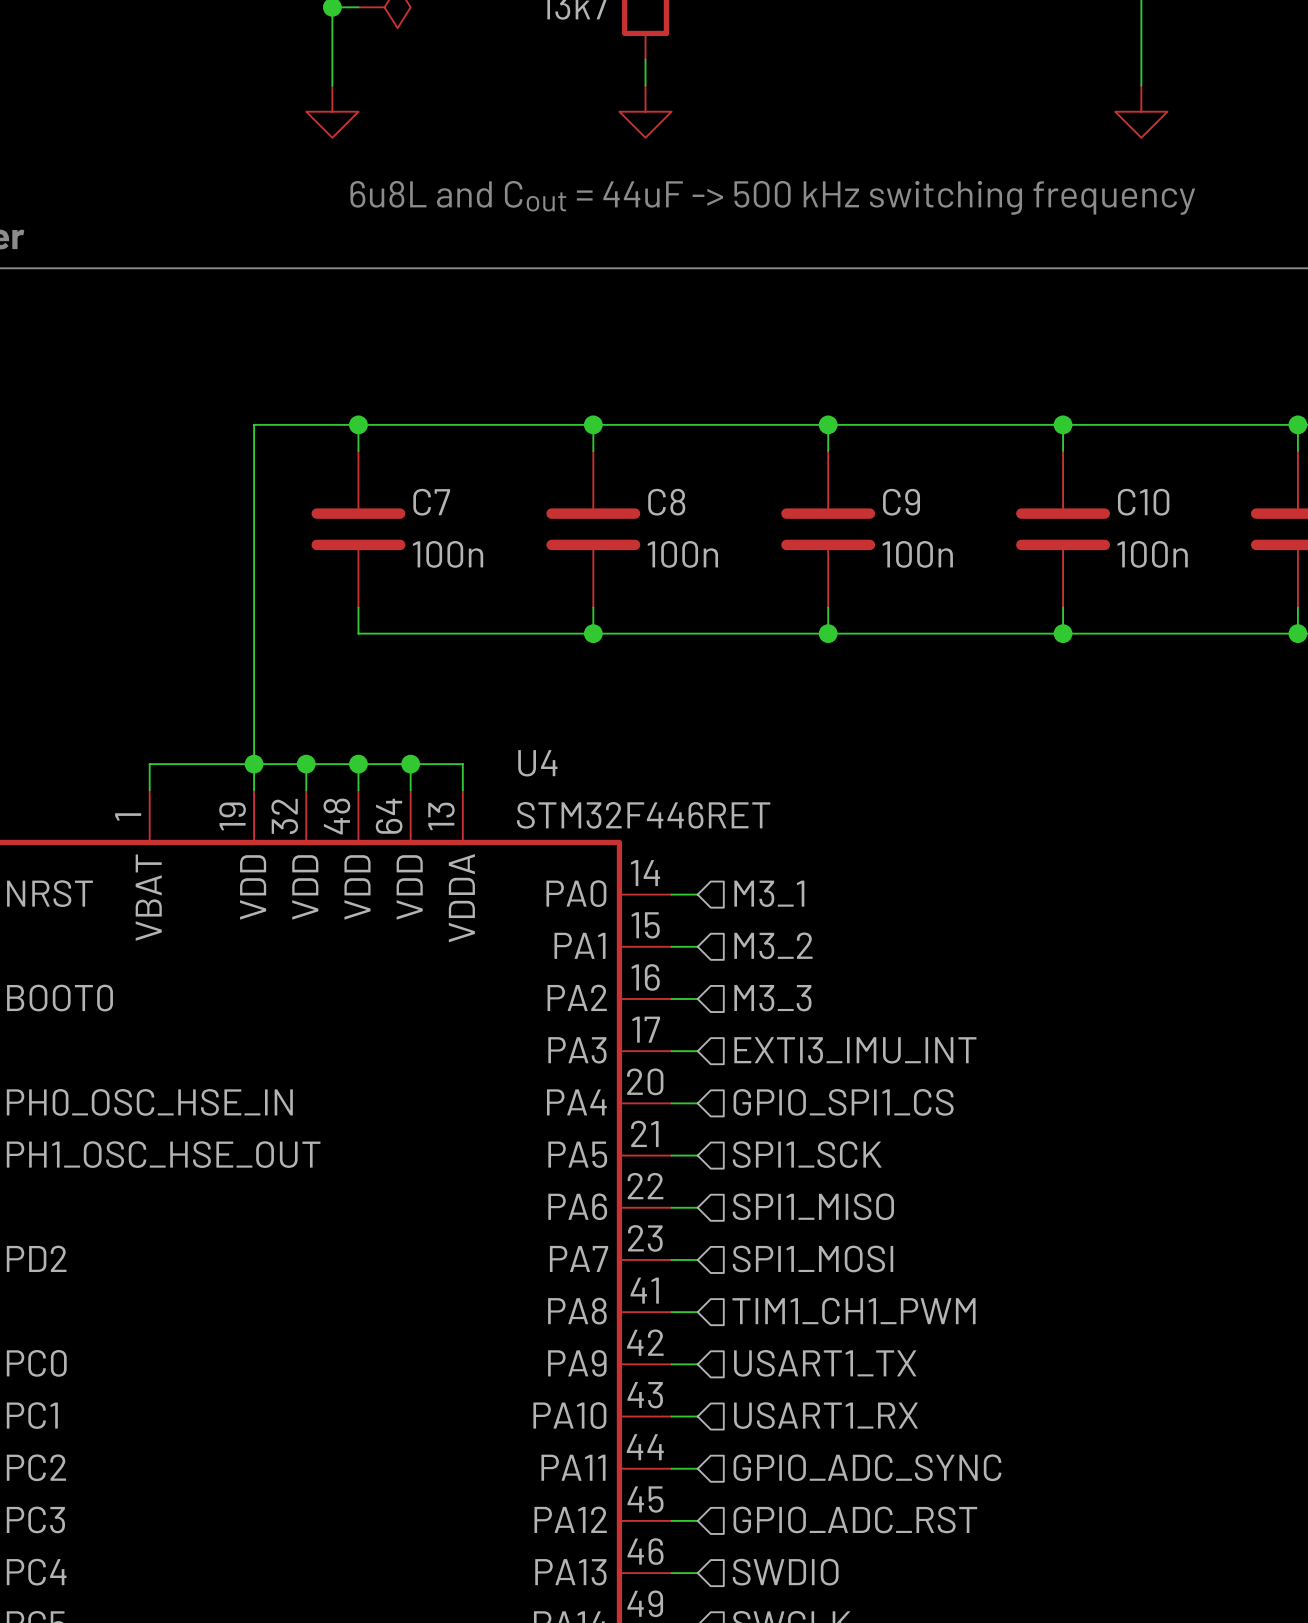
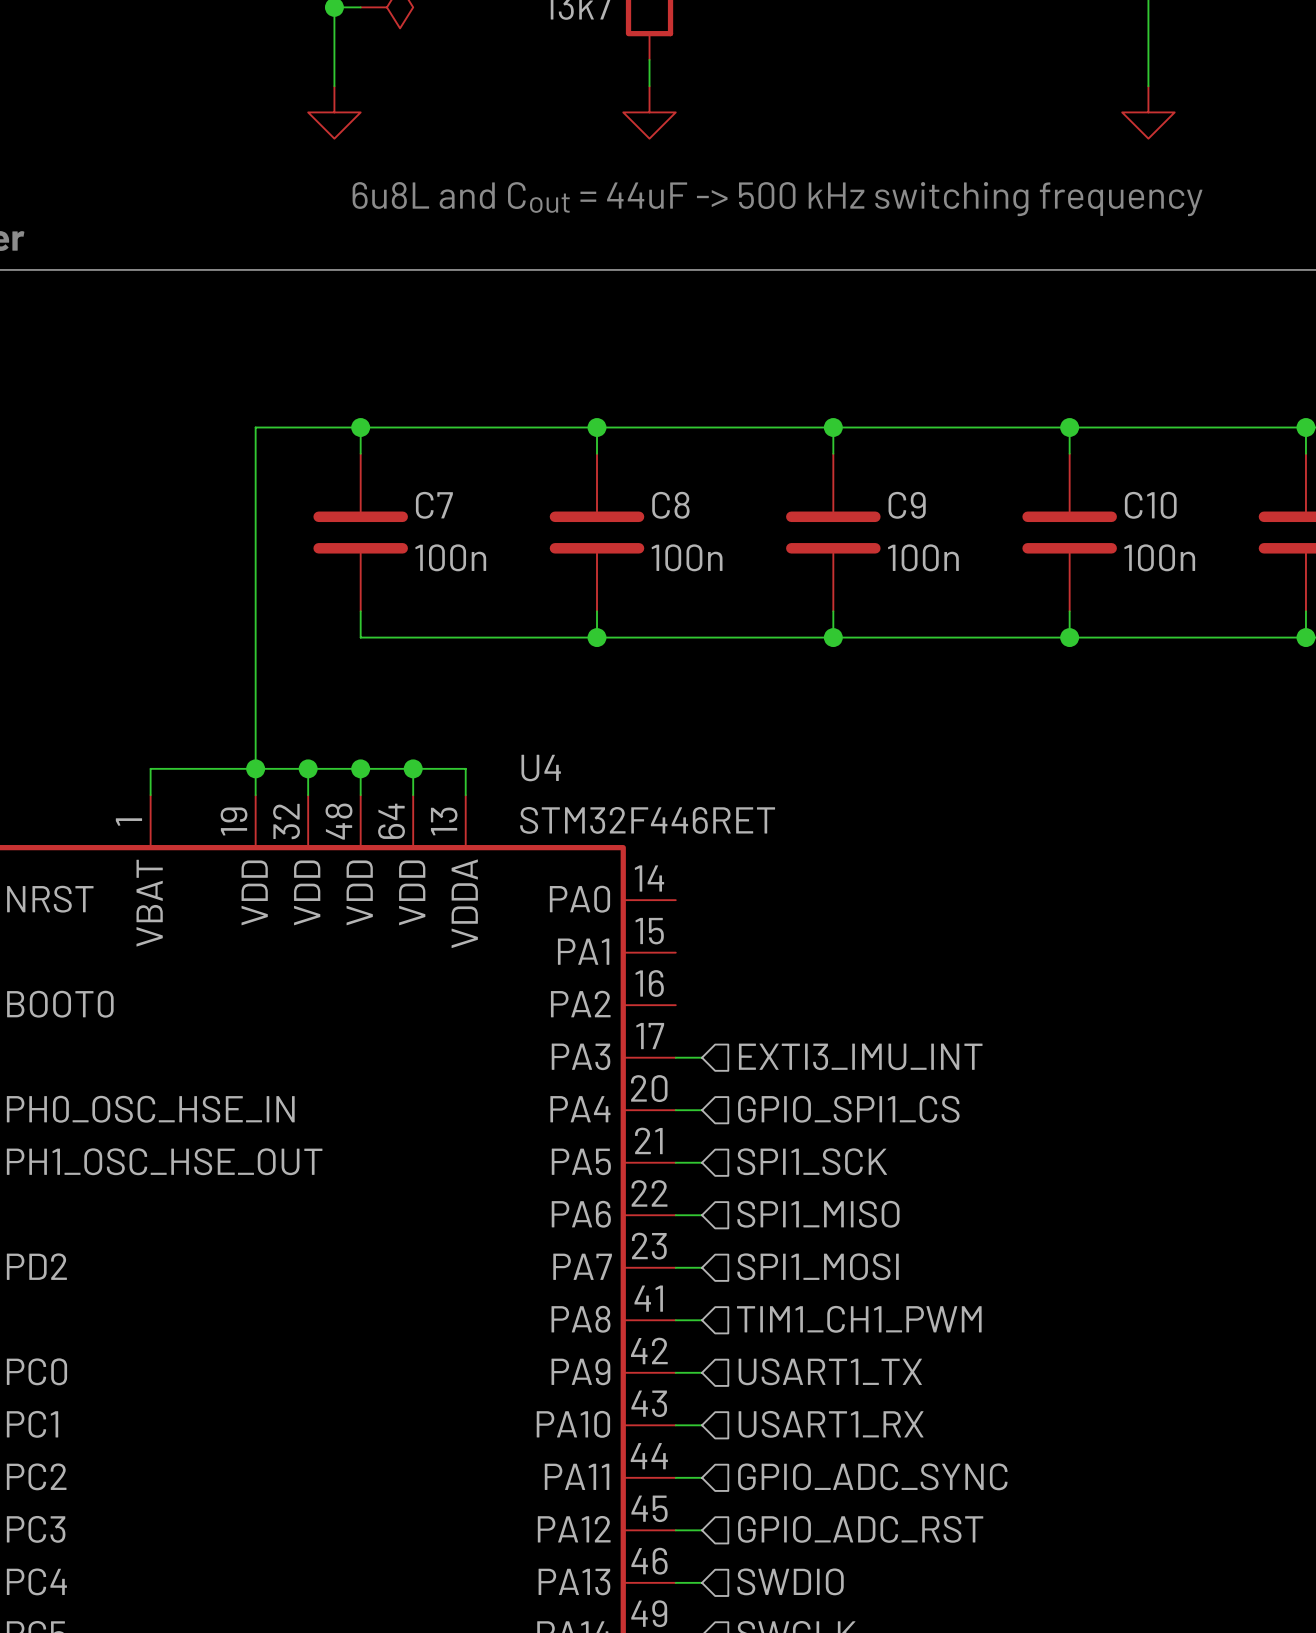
hierarchical label: M3_1 (769, 893) -> none
wire: (671, 894) (697, 894) -> none
hierarchical label: M3_2 (773, 945) -> none
wire: (671, 946) (697, 946) -> none
wire: (671, 998) (697, 998) -> none
hierarchical label: M3_3 (772, 998) -> none

